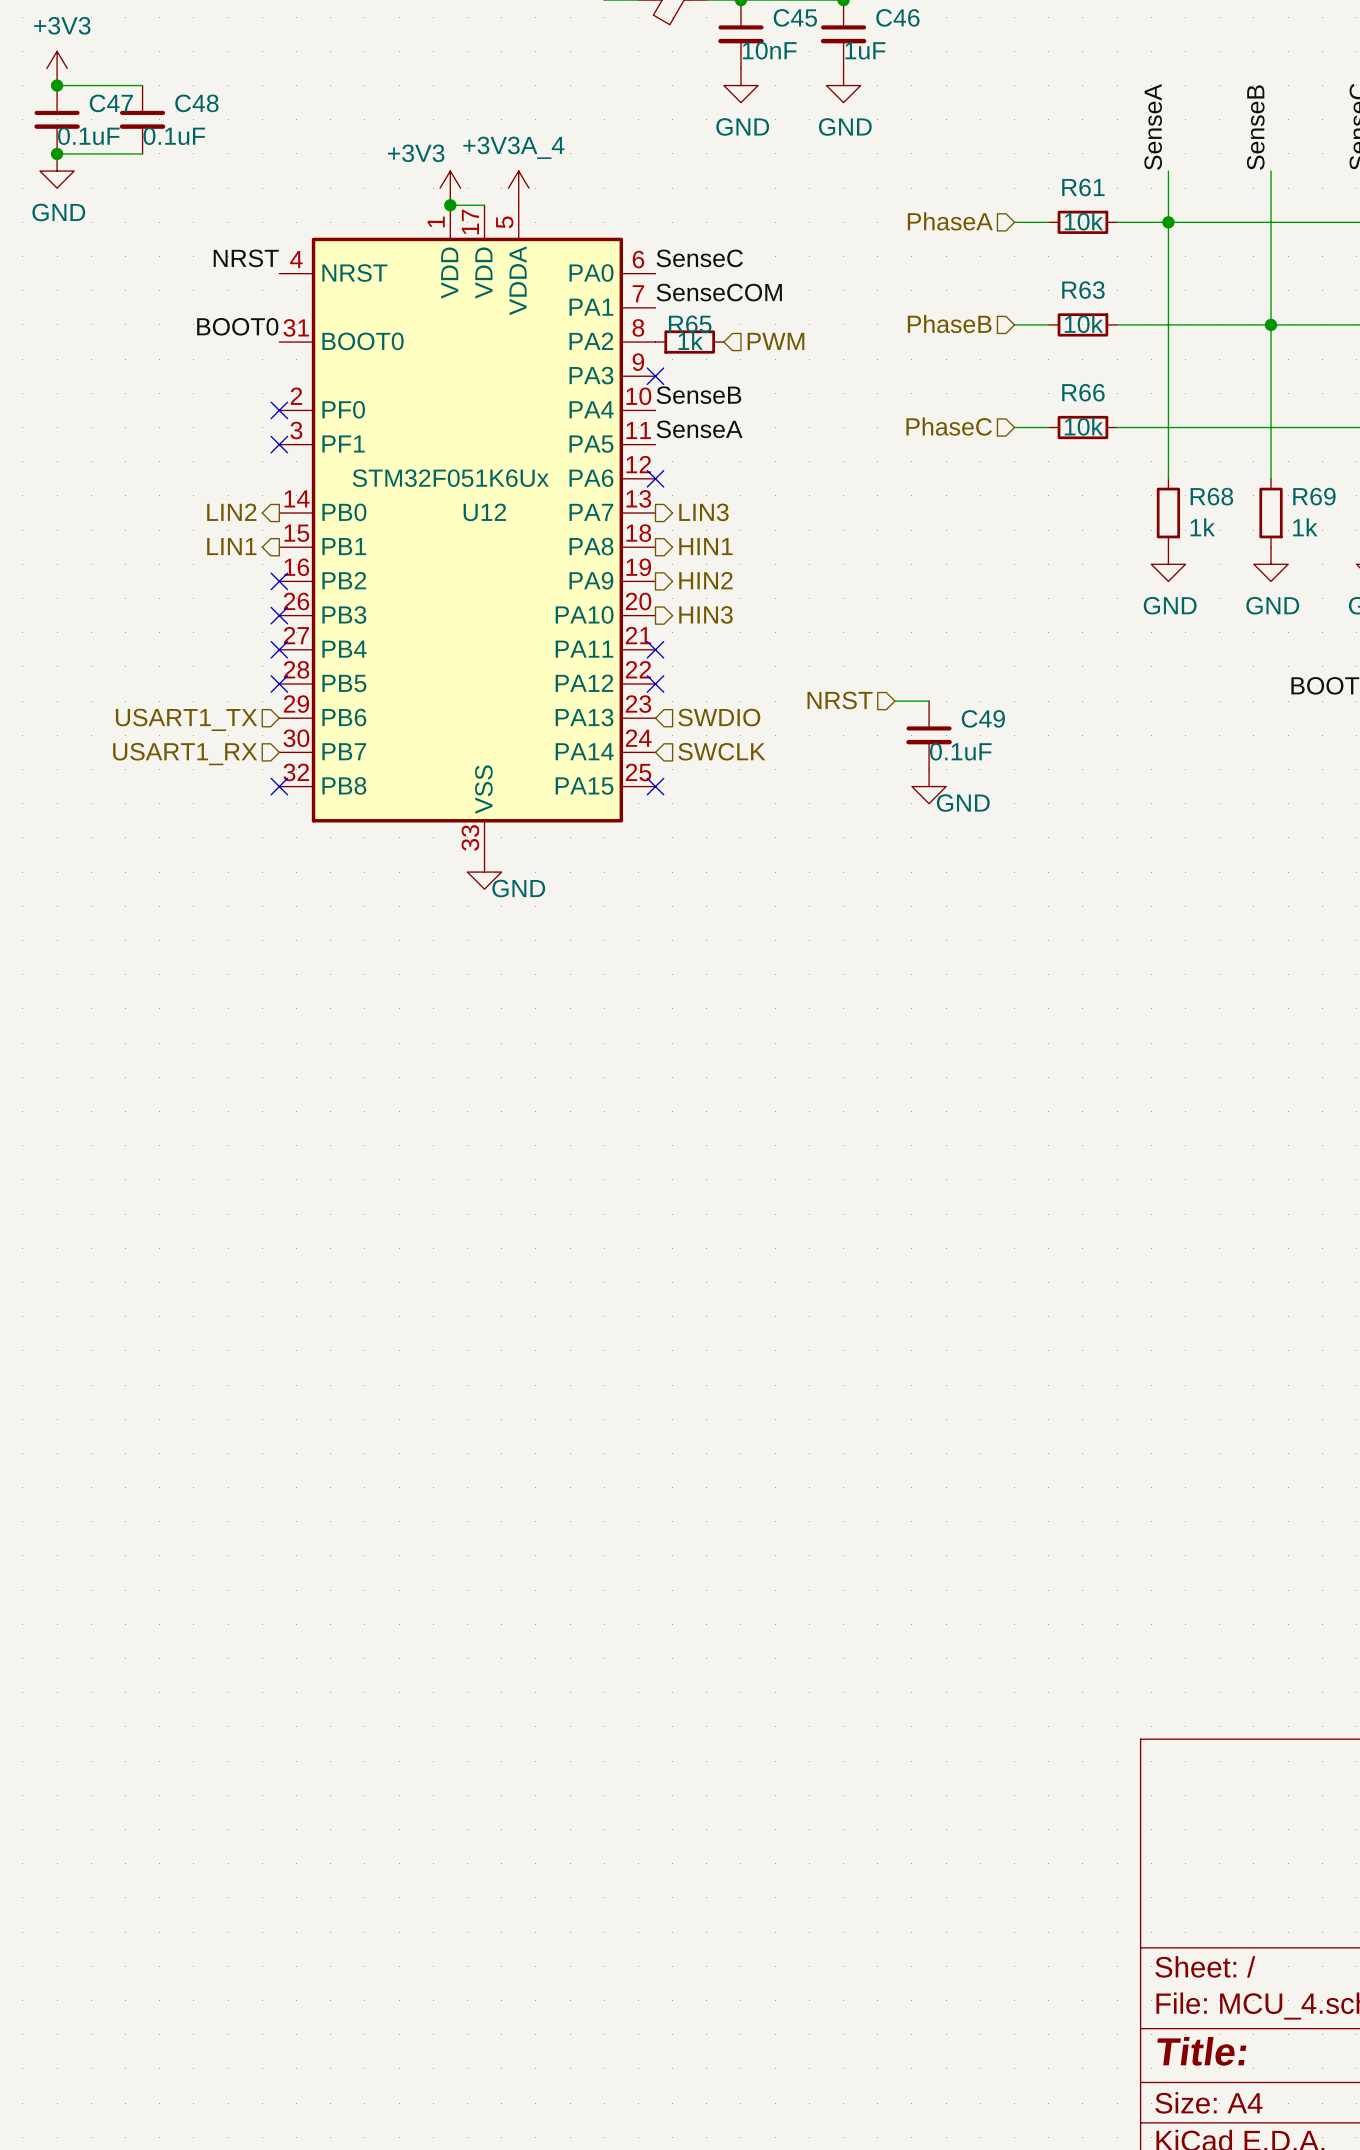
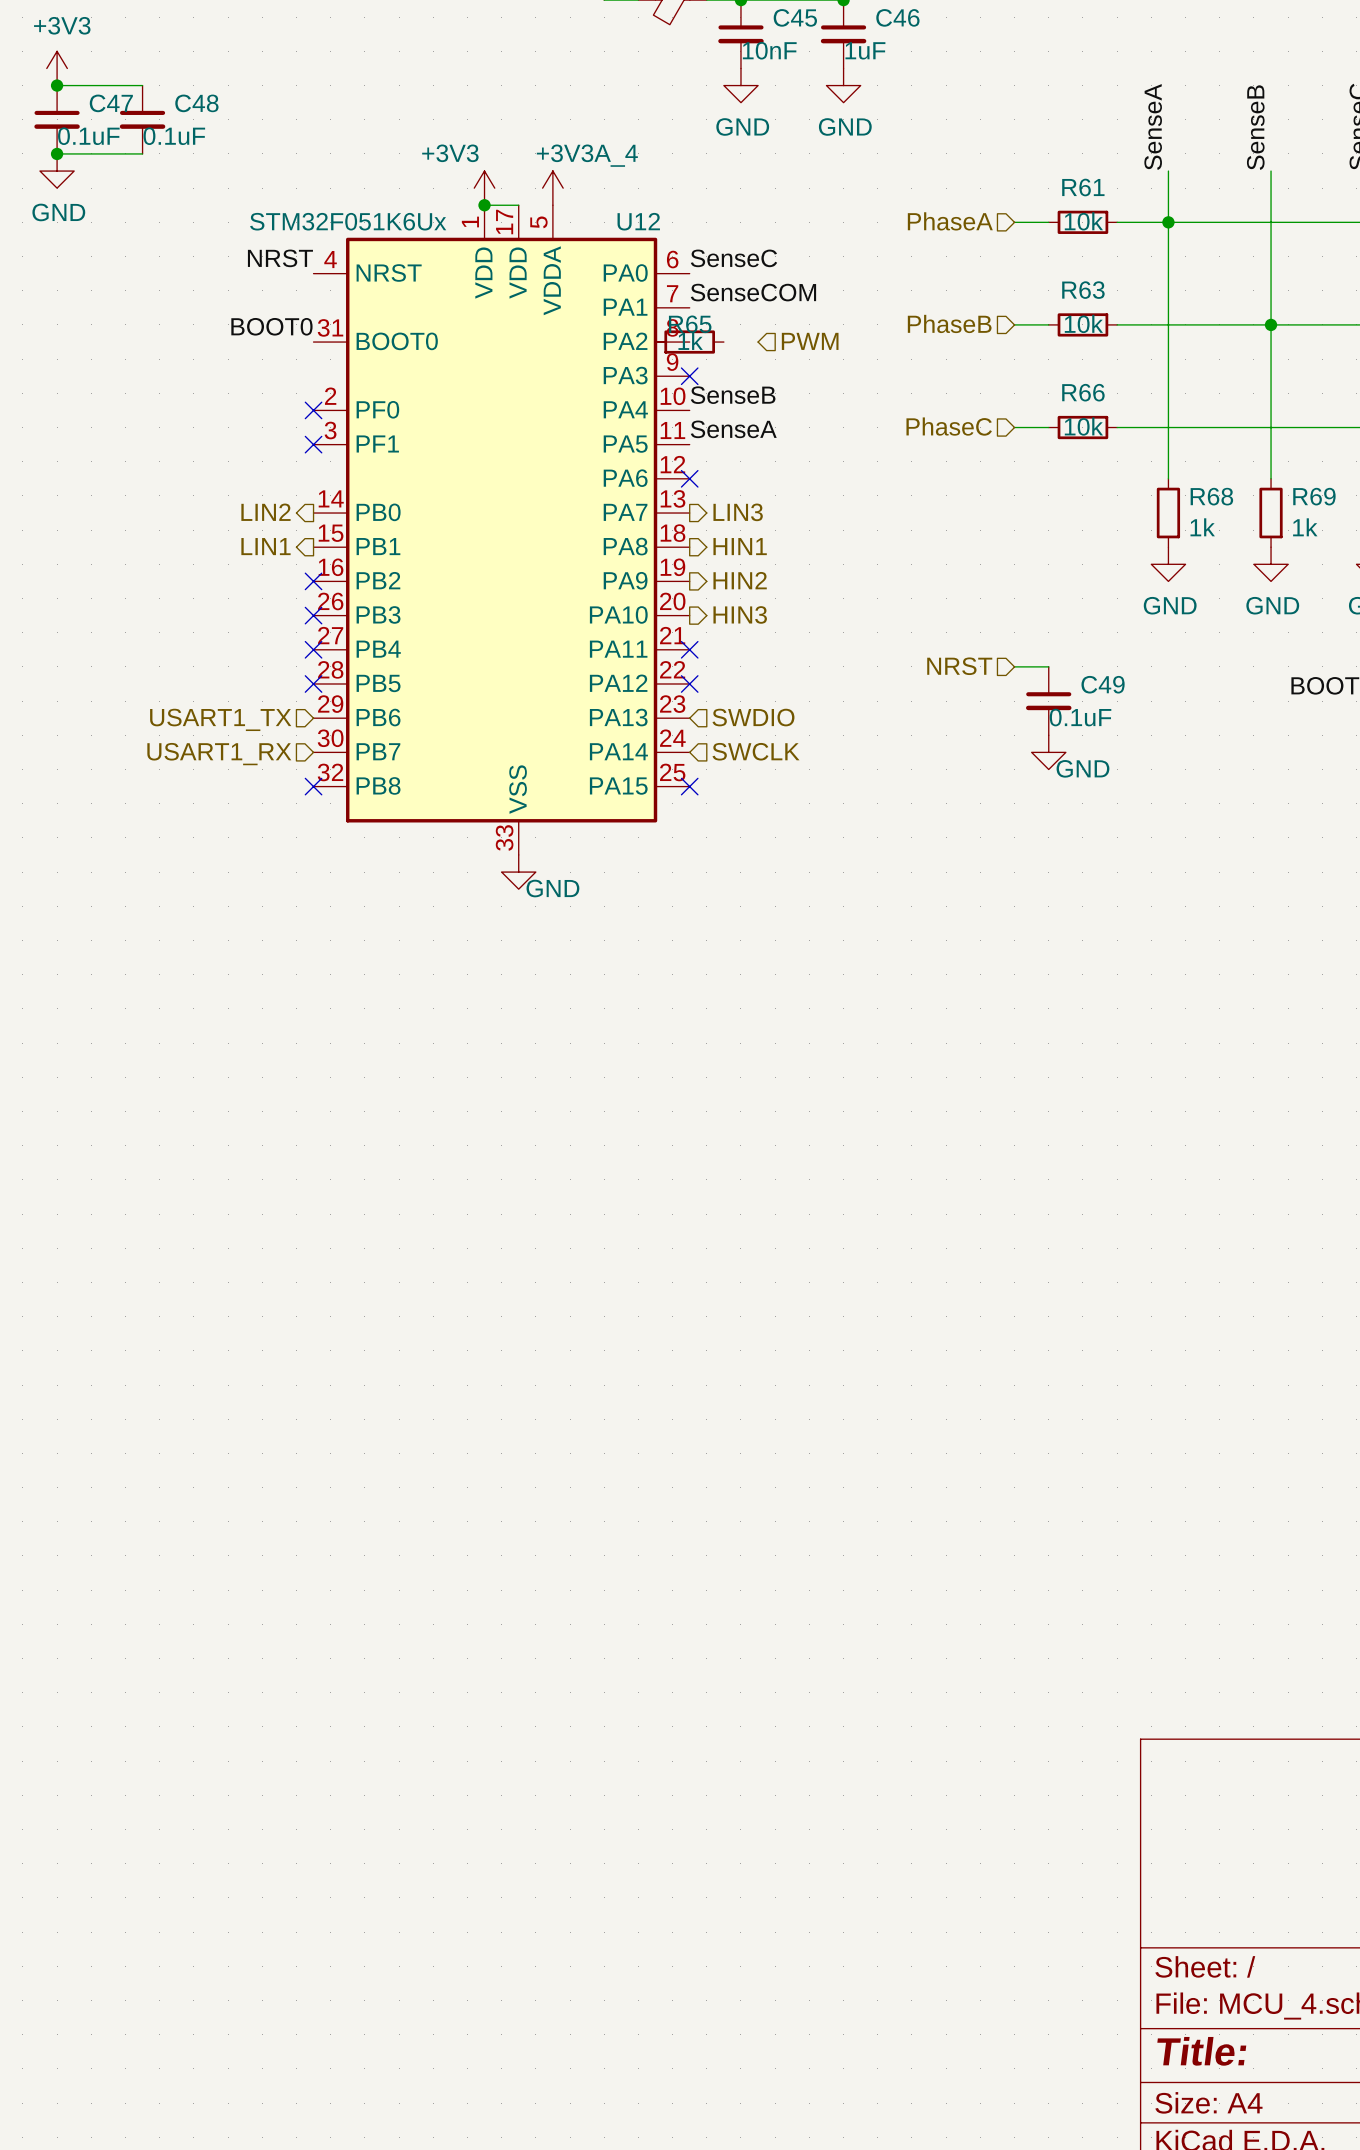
power symbol text position: +3V3A_4 (513, 147) -> +3V3A_4 (587, 155)
power symbol position: +3V3 (450, 188) -> +3V3 (484, 188)
power symbol position: +3V3A_4 (518, 188) -> +3V3A_4 (552, 188)
wire: (450, 205) (484, 205) -> (518, 205) (484, 205)
junction position: (450, 205) -> (484, 205)
label position: NRST (246, 258) -> NRST (280, 258)
label position: SenseC (699, 258) -> SenseC (733, 258)
label position: SenseCOM (719, 292) -> SenseCOM (753, 292)
label position: BOOT0 (237, 326) -> BOOT0 (271, 326)
hierarchical label position: PWM (775, 341) -> PWM (810, 341)
no-connect mark position: (655, 376) -> (689, 376)
label position: SenseB (698, 395) -> SenseB (733, 395)
no-connect mark: (279, 410) -> none
no-connect mark: none -> (313, 410)
label position: SenseA (699, 429) -> SenseA (733, 429)
no-connect mark: (279, 444) -> none
no-connect mark: none -> (313, 444)
U12 value position: STM32F051K6Ux (450, 478) -> STM32F051K6Ux (348, 221)
no-connect mark position: (655, 478) -> (689, 478)
hierarchical label position: LIN2 (231, 512) -> LIN2 (265, 512)
U12 name position: U12 (484, 512) -> U12 (638, 221)
hierarchical label position: LIN3 (703, 512) -> LIN3 (738, 512)
U12 position: (467, 530) -> (501, 530)
hierarchical label position: LIN1 (231, 546) -> LIN1 (265, 546)
hierarchical label position: HIN1 (705, 546) -> HIN1 (740, 546)
hierarchical label position: HIN2 (705, 580) -> HIN2 (740, 580)
no-connect mark: (279, 581) -> none
no-connect mark: none -> (313, 581)
hierarchical label position: HIN3 (705, 614) -> HIN3 (740, 614)
no-connect mark: (279, 615) -> none
no-connect mark: none -> (313, 615)
no-connect mark: (279, 649) -> none
no-connect mark: none -> (313, 649)
no-connect mark: (655, 649) -> none
no-connect mark: none -> (689, 649)
no-connect mark: (279, 683) -> none
no-connect mark: none -> (313, 683)
no-connect mark: (655, 683) -> none
no-connect mark: none -> (689, 683)
hierarchical label position: NRST (840, 700) -> NRST (959, 666)
wire: (894, 701) (929, 701) -> (1014, 666) (1048, 666)
hierarchical label position: SWDIO (719, 717) -> SWDIO (753, 717)
hierarchical label position: USART1_TX (186, 719) -> USART1_TX (220, 719)
C49 position: (929, 735) -> (1048, 701)
hierarchical label position: SWCLK (721, 751) -> SWCLK (756, 751)
hierarchical label position: USART1_RX (185, 754) -> USART1_RX (219, 754)
no-connect mark position: (279, 786) -> (313, 786)
no-connect mark position: (655, 786) -> (689, 786)
power symbol position: GND (929, 786) -> GND (1048, 752)
power symbol position: GND (484, 872) -> GND (518, 872)

